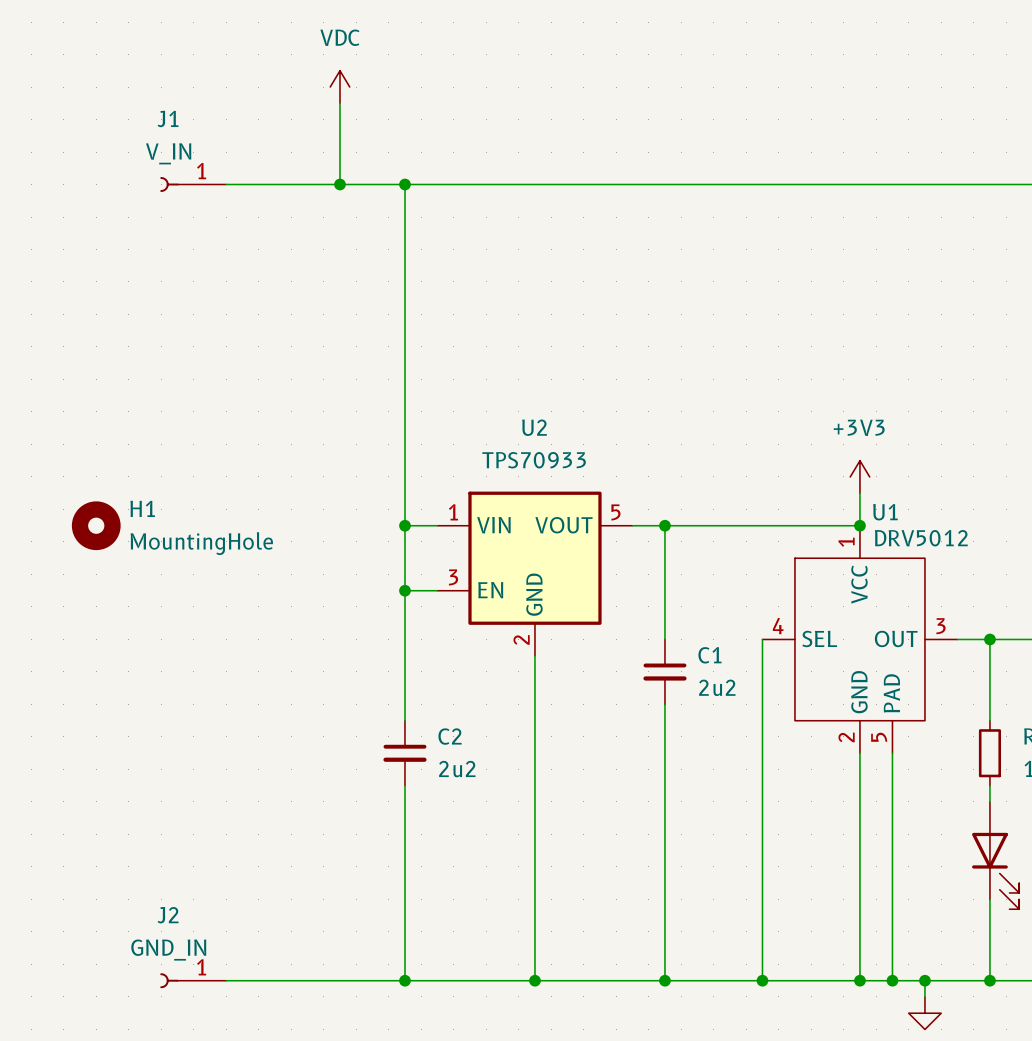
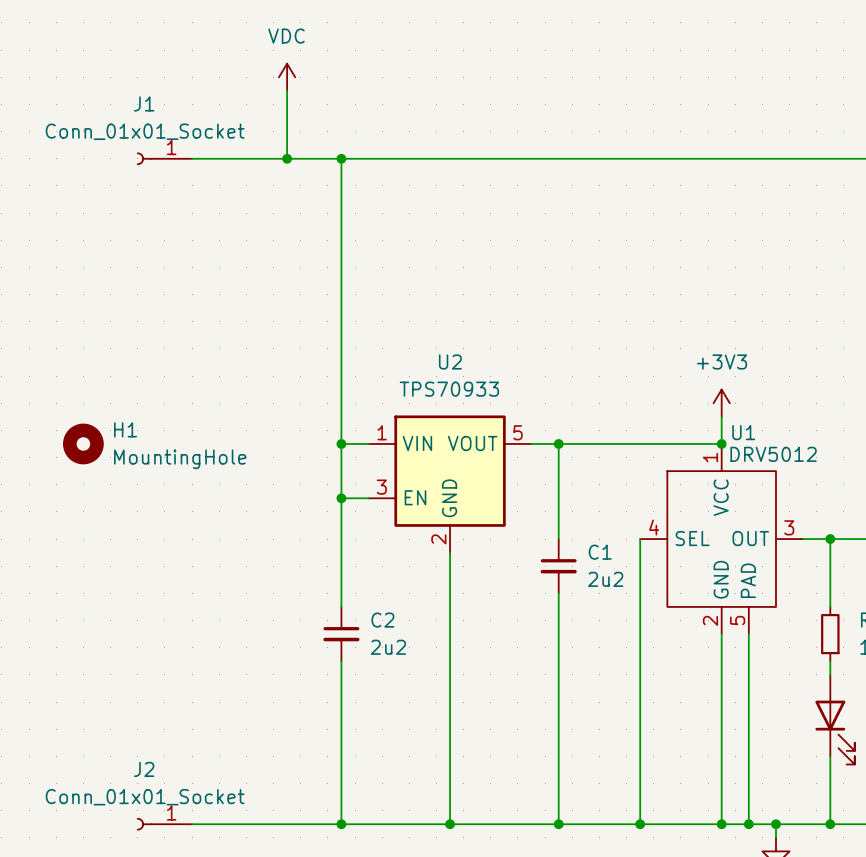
J1 value: V_IN (168, 153) -> Conn_01x01_Socket (145, 131)
J2 value: GND_IN (168, 950) -> Conn_01x01_Socket (145, 797)

